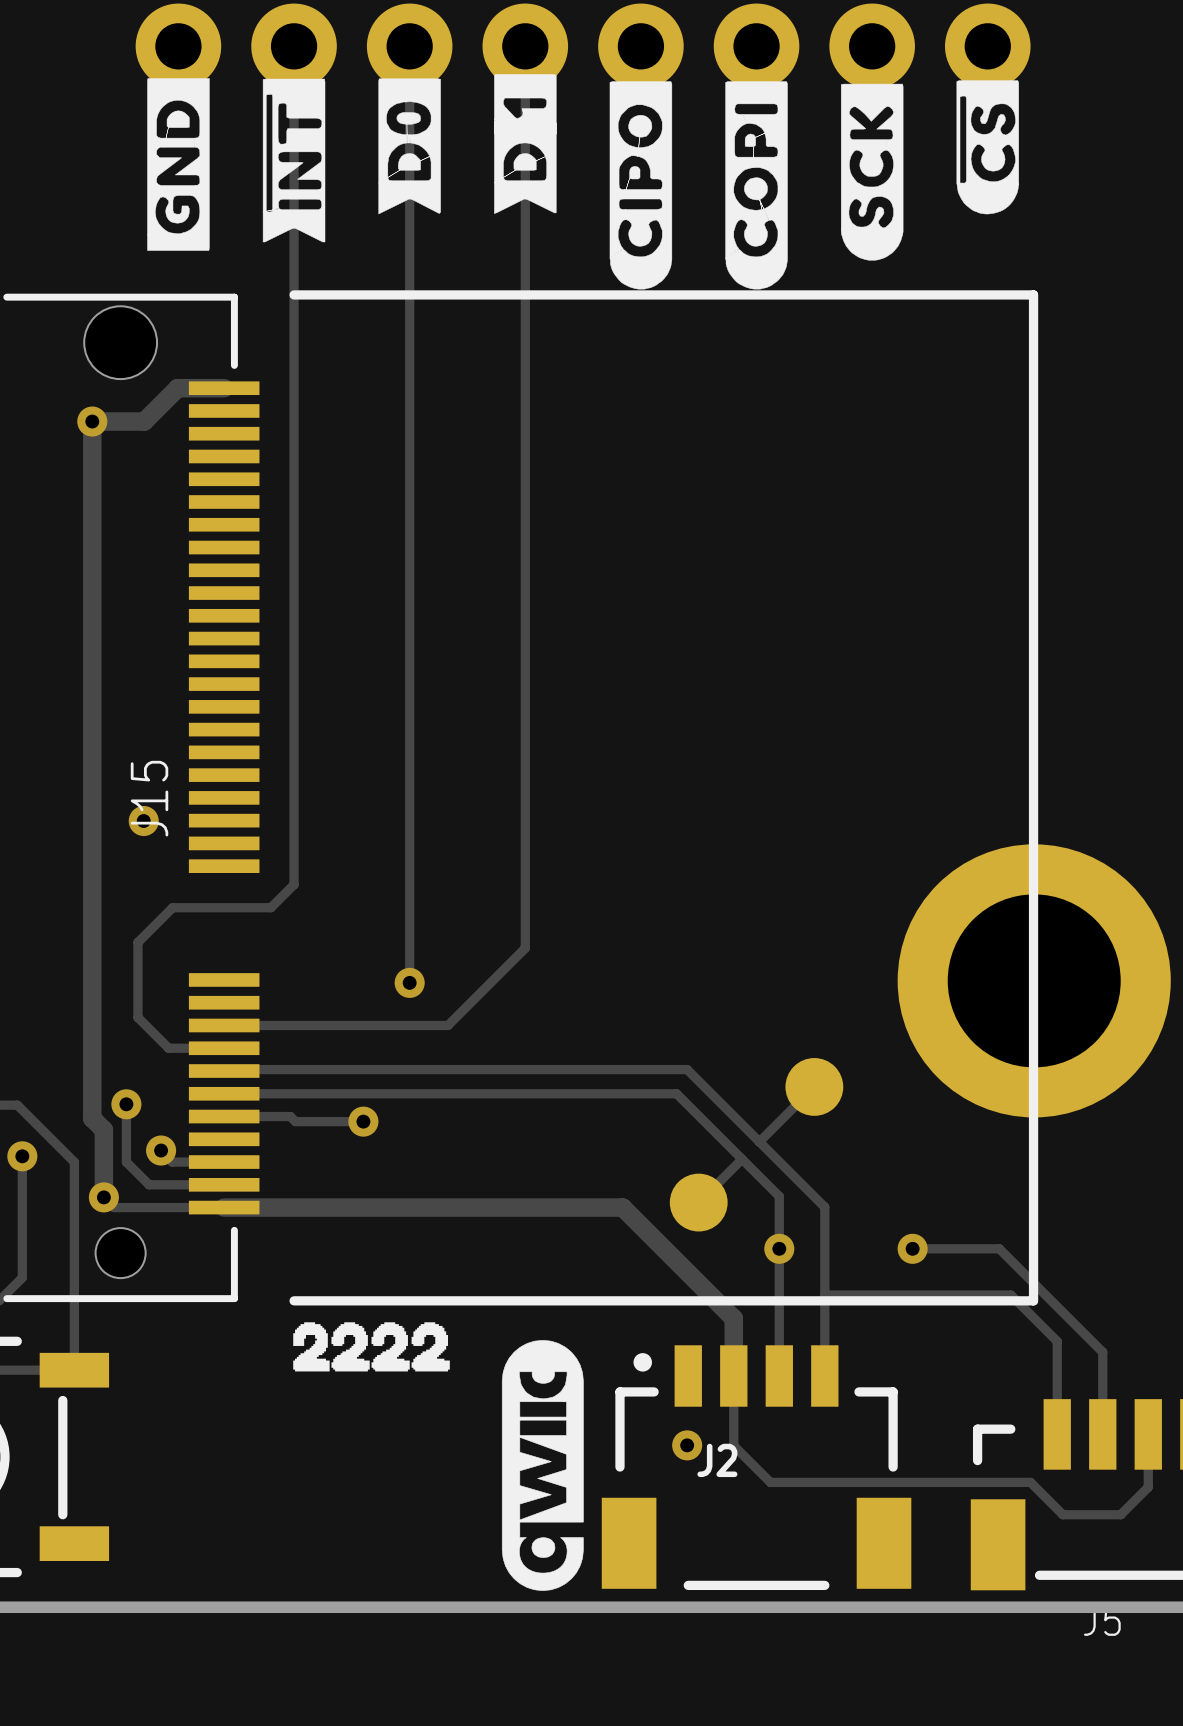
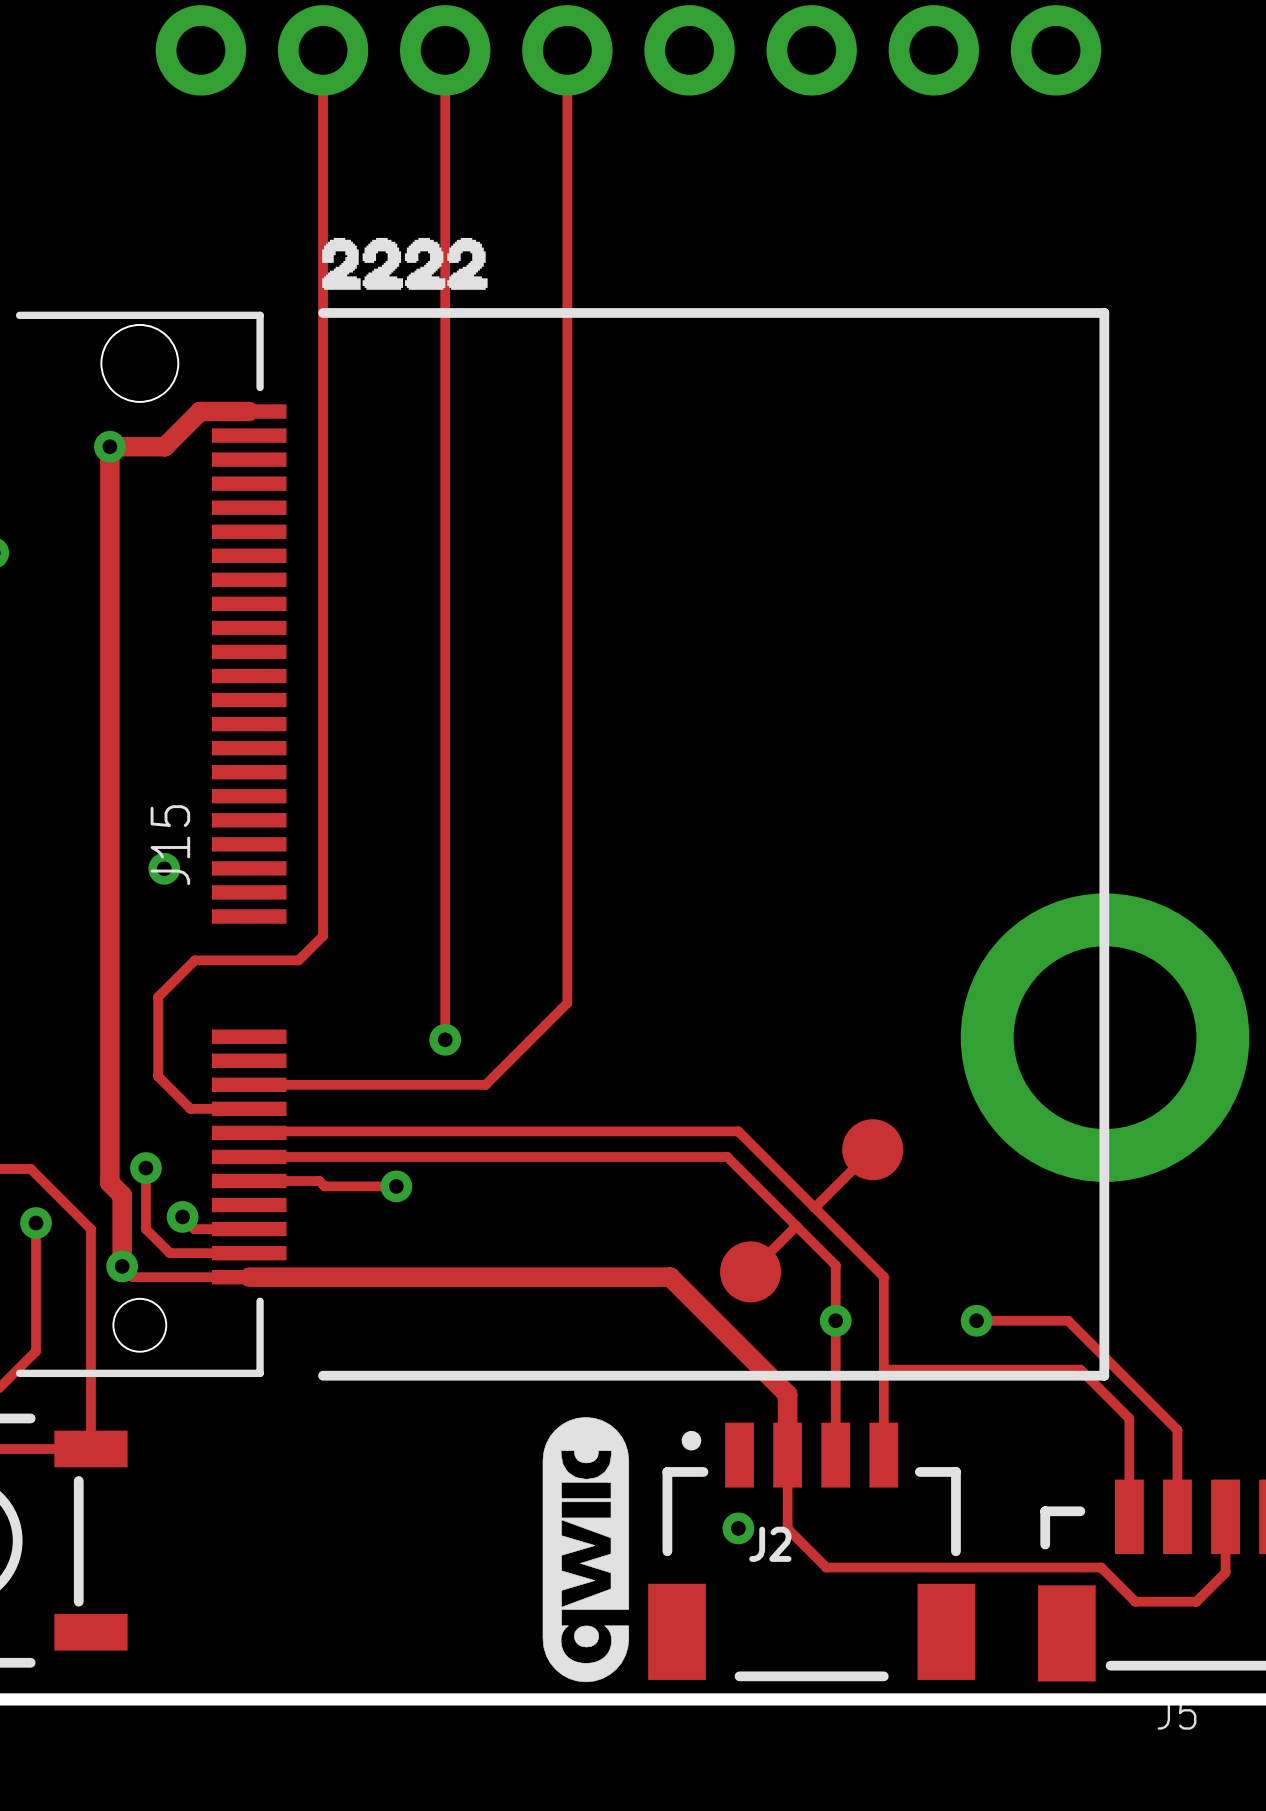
drawing: [147, 74, 1019, 290] -> none
drawing position: (371, 1346) -> (404, 263)

